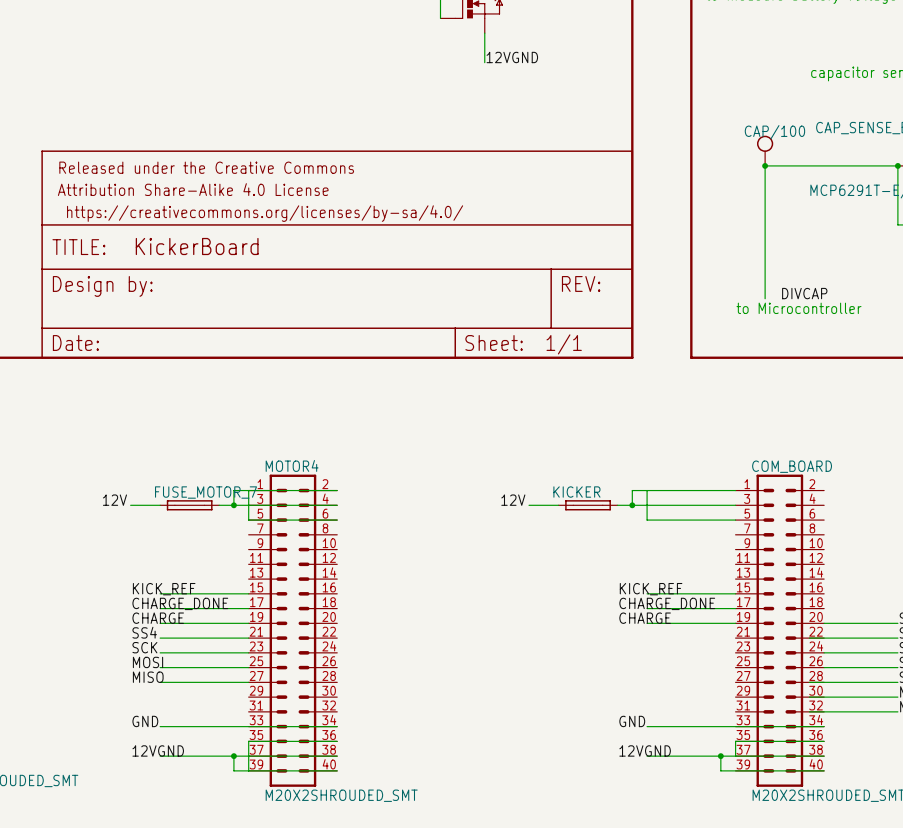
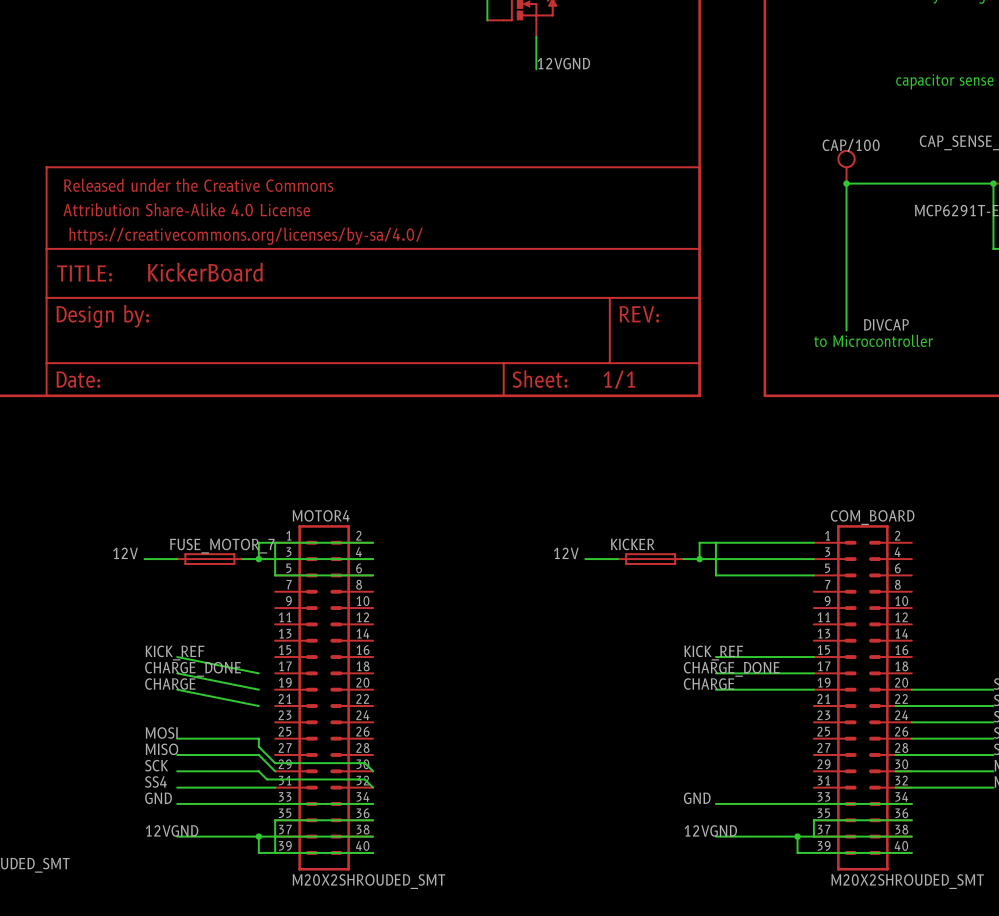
wire: (160, 593) (248, 593) -> (177, 657) (258, 673)
wire: (160, 608) (248, 608) -> (177, 673) (258, 689)
wire: (160, 623) (248, 623) -> (177, 689) (258, 706)
label position: SS4 (144, 632) -> SS4 (155, 781)
wire: (160, 638) (248, 638) -> none
label position: SCK (144, 647) -> SCK (156, 765)
wire: (160, 652) (248, 652) -> (177, 787) (275, 787)
wire: (233, 667) (248, 667) -> (258, 738) (258, 746) (275, 763) (364, 763) (373, 771)
wire: (233, 682) (248, 682) -> (258, 754) (275, 771)
wire: none -> (177, 771) (258, 771) (266, 779) (364, 779) (373, 787)

